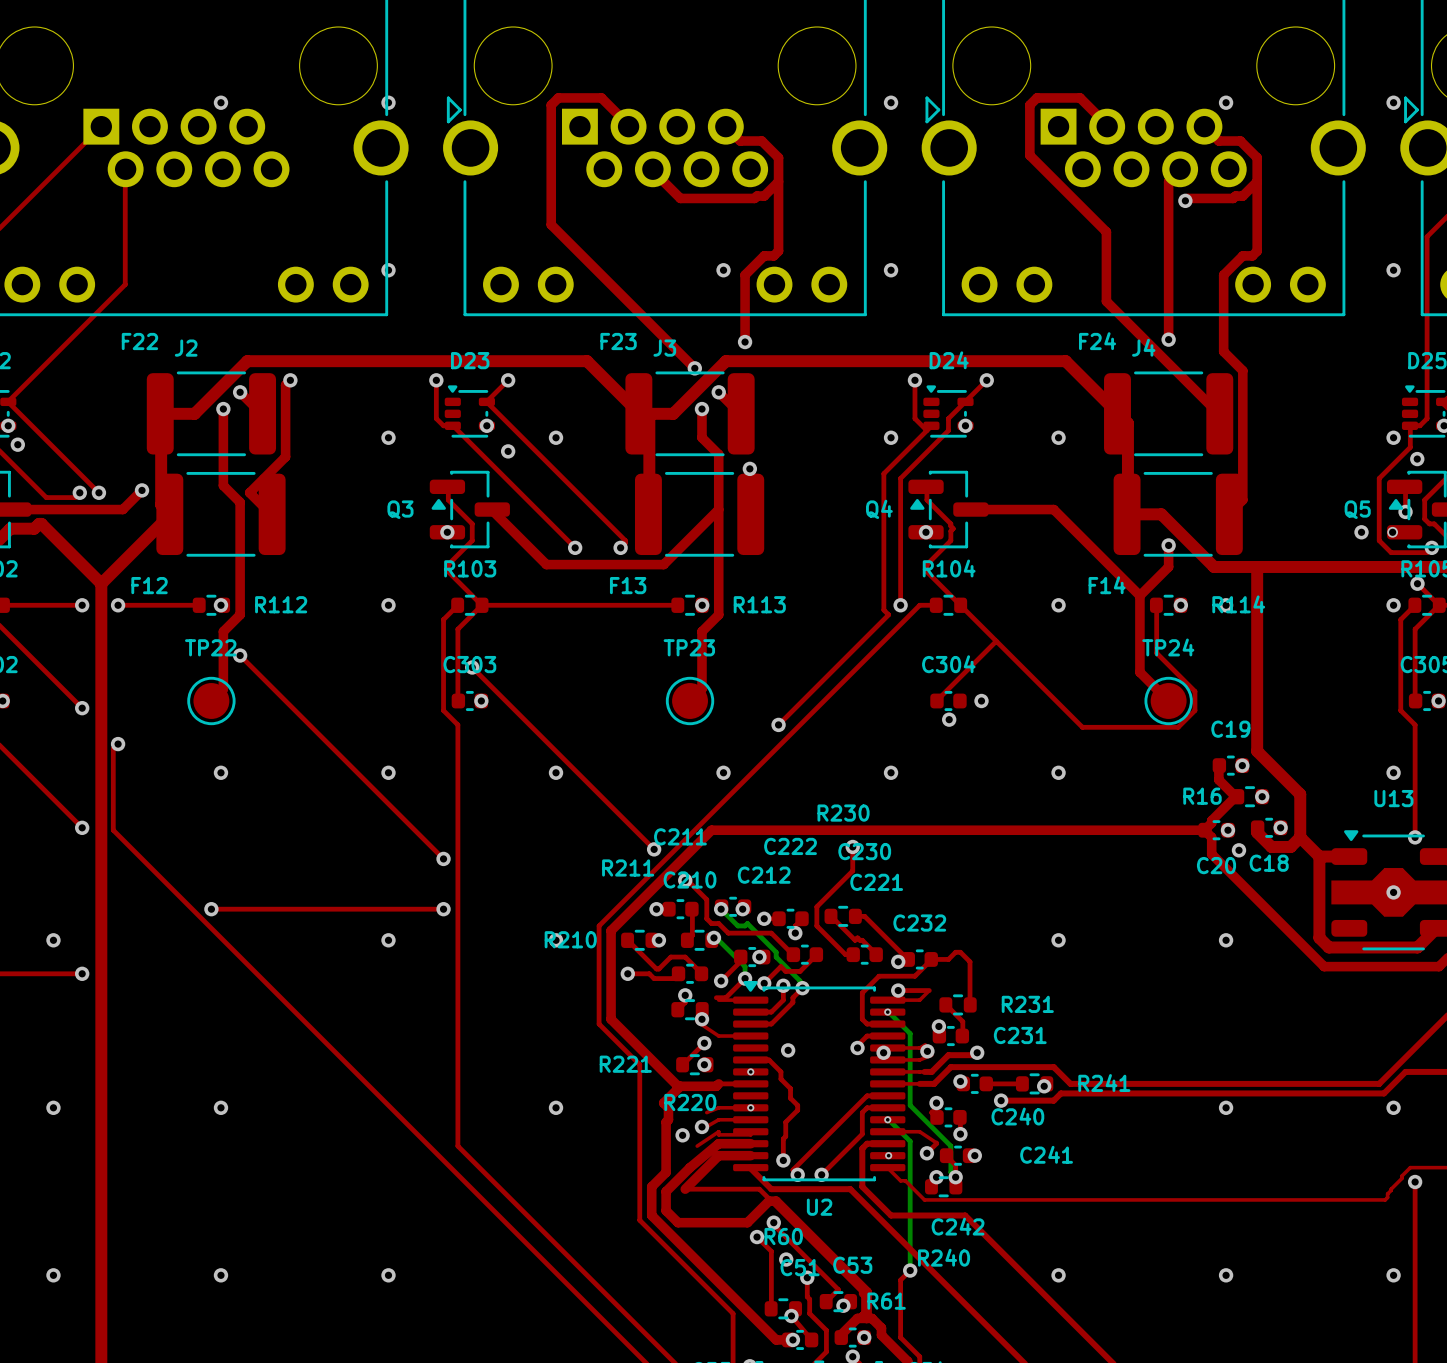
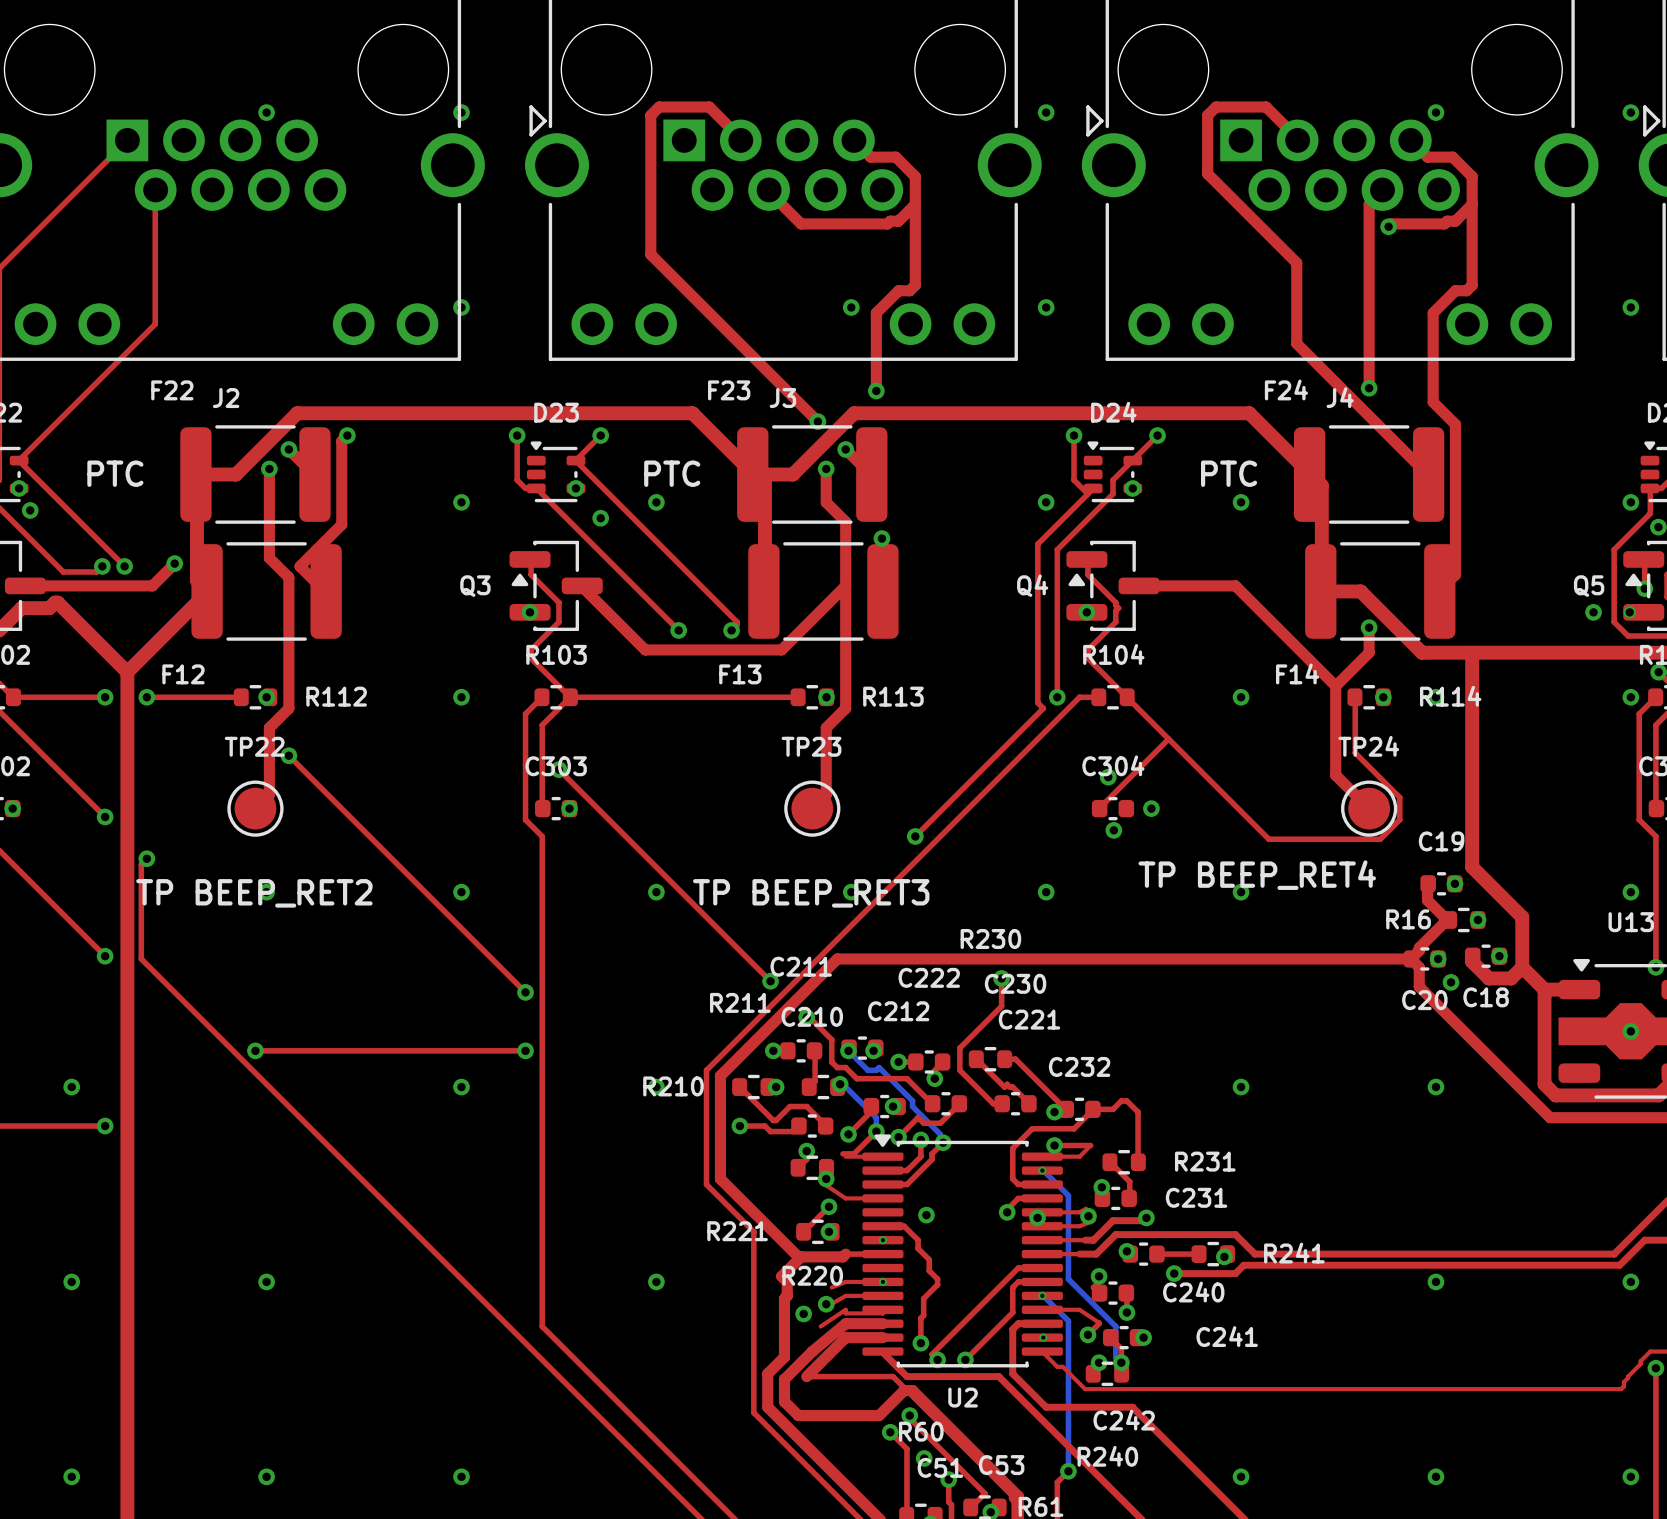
text: none -> PTC (115, 473)
text: none -> PTC (672, 473)
text: none -> PTC (1229, 473)
via: none -> (1108, 777)
text: none -> TP BEEP_RET4 (1257, 875)
text: none -> TP BEEP_RET2 (254, 893)
text: none -> TP BEEP_RET3 (811, 893)

